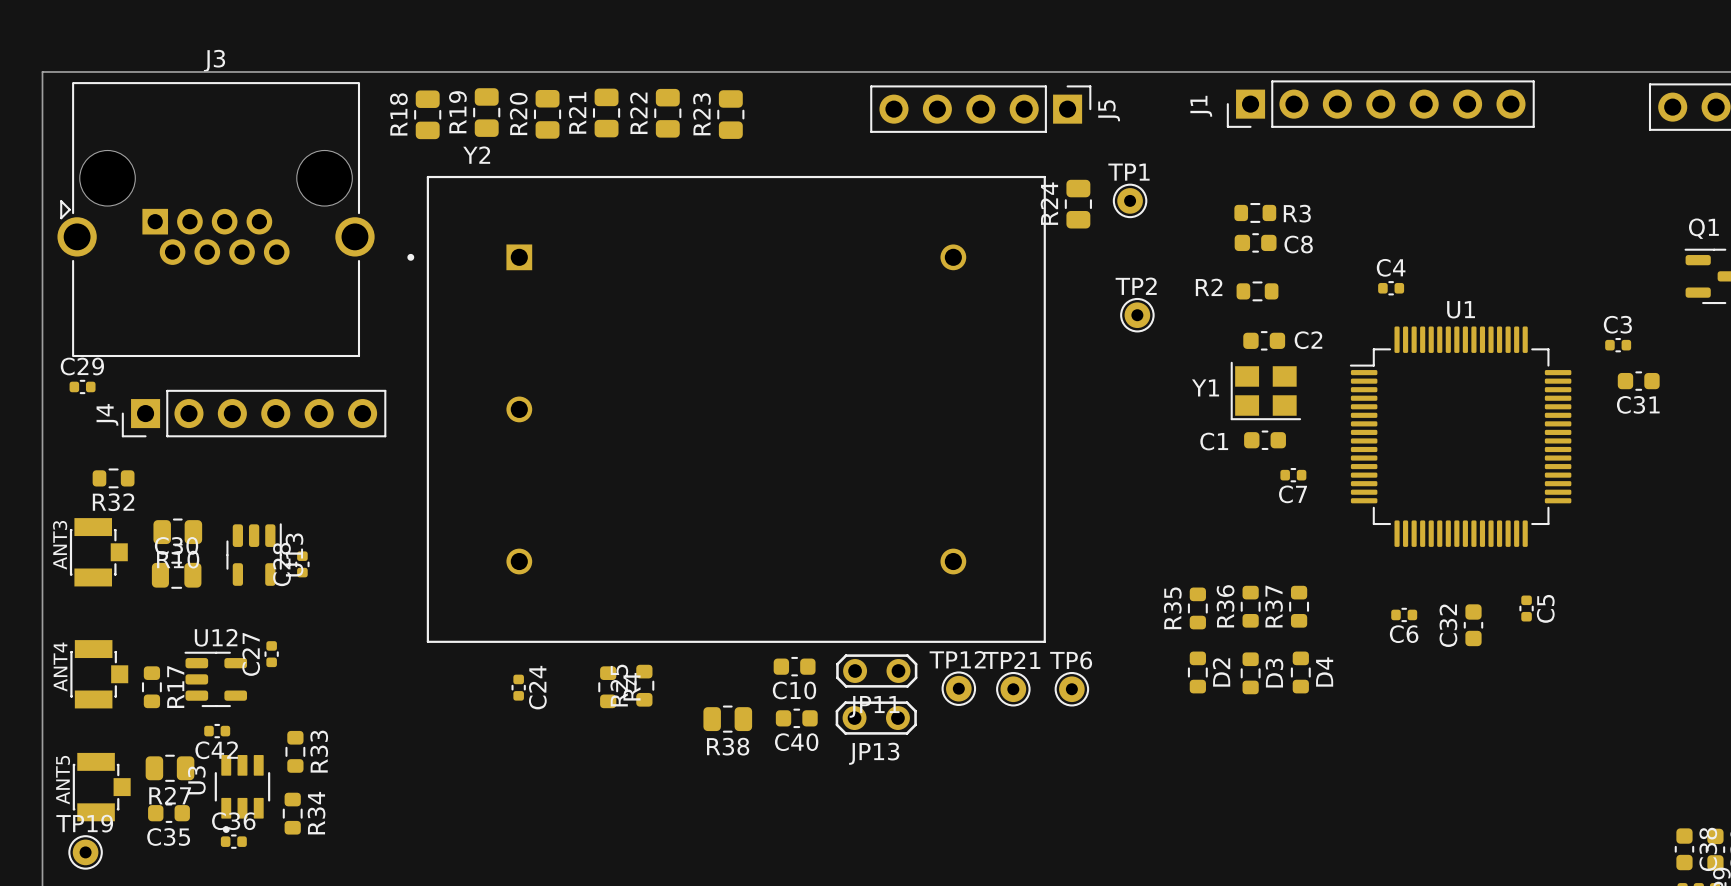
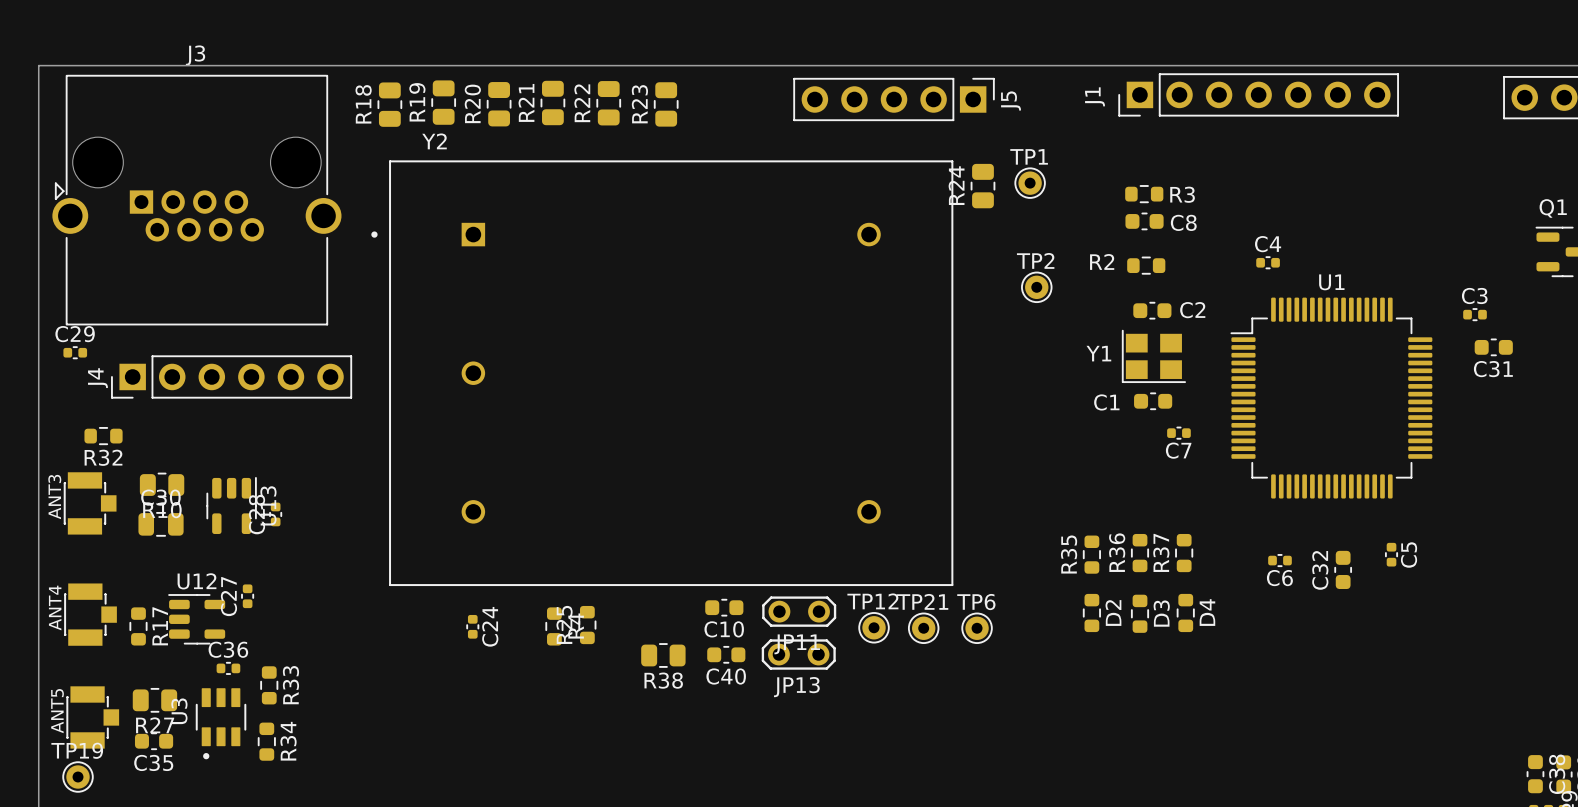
C42: (217, 731) -> none
C36 position: (233, 841) -> (228, 668)

